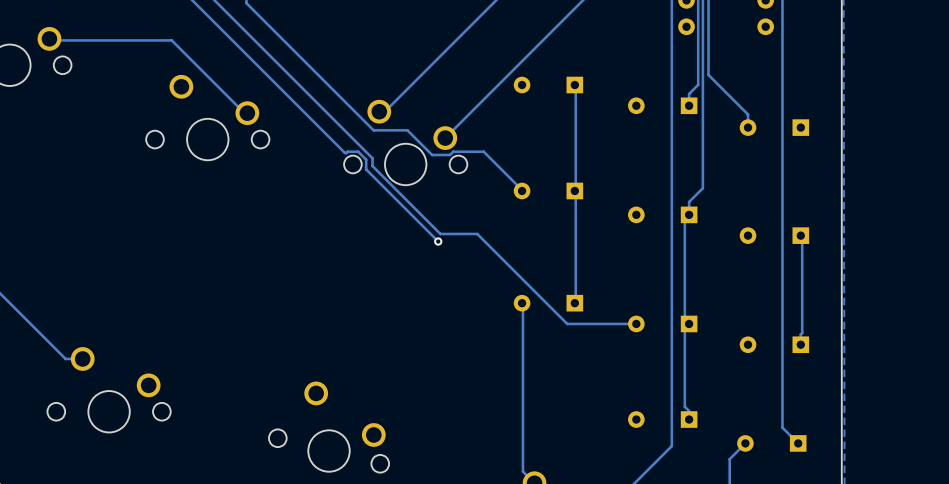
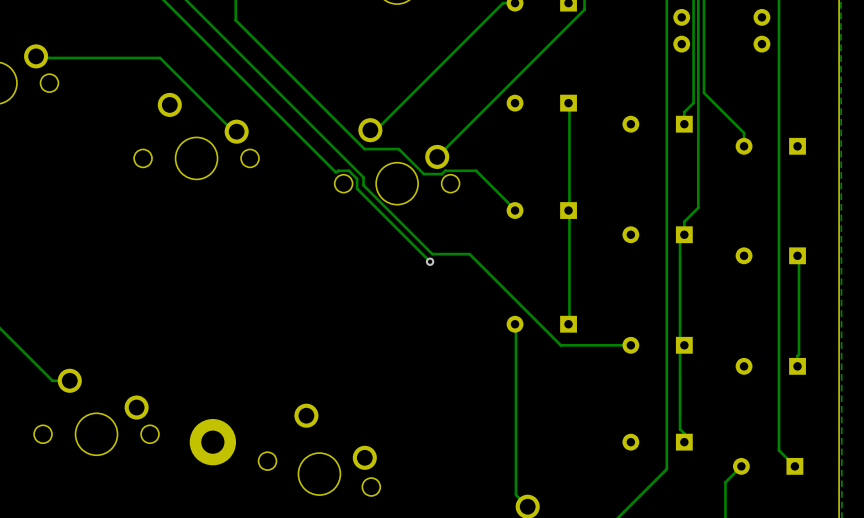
part: none -> (212, 442)

